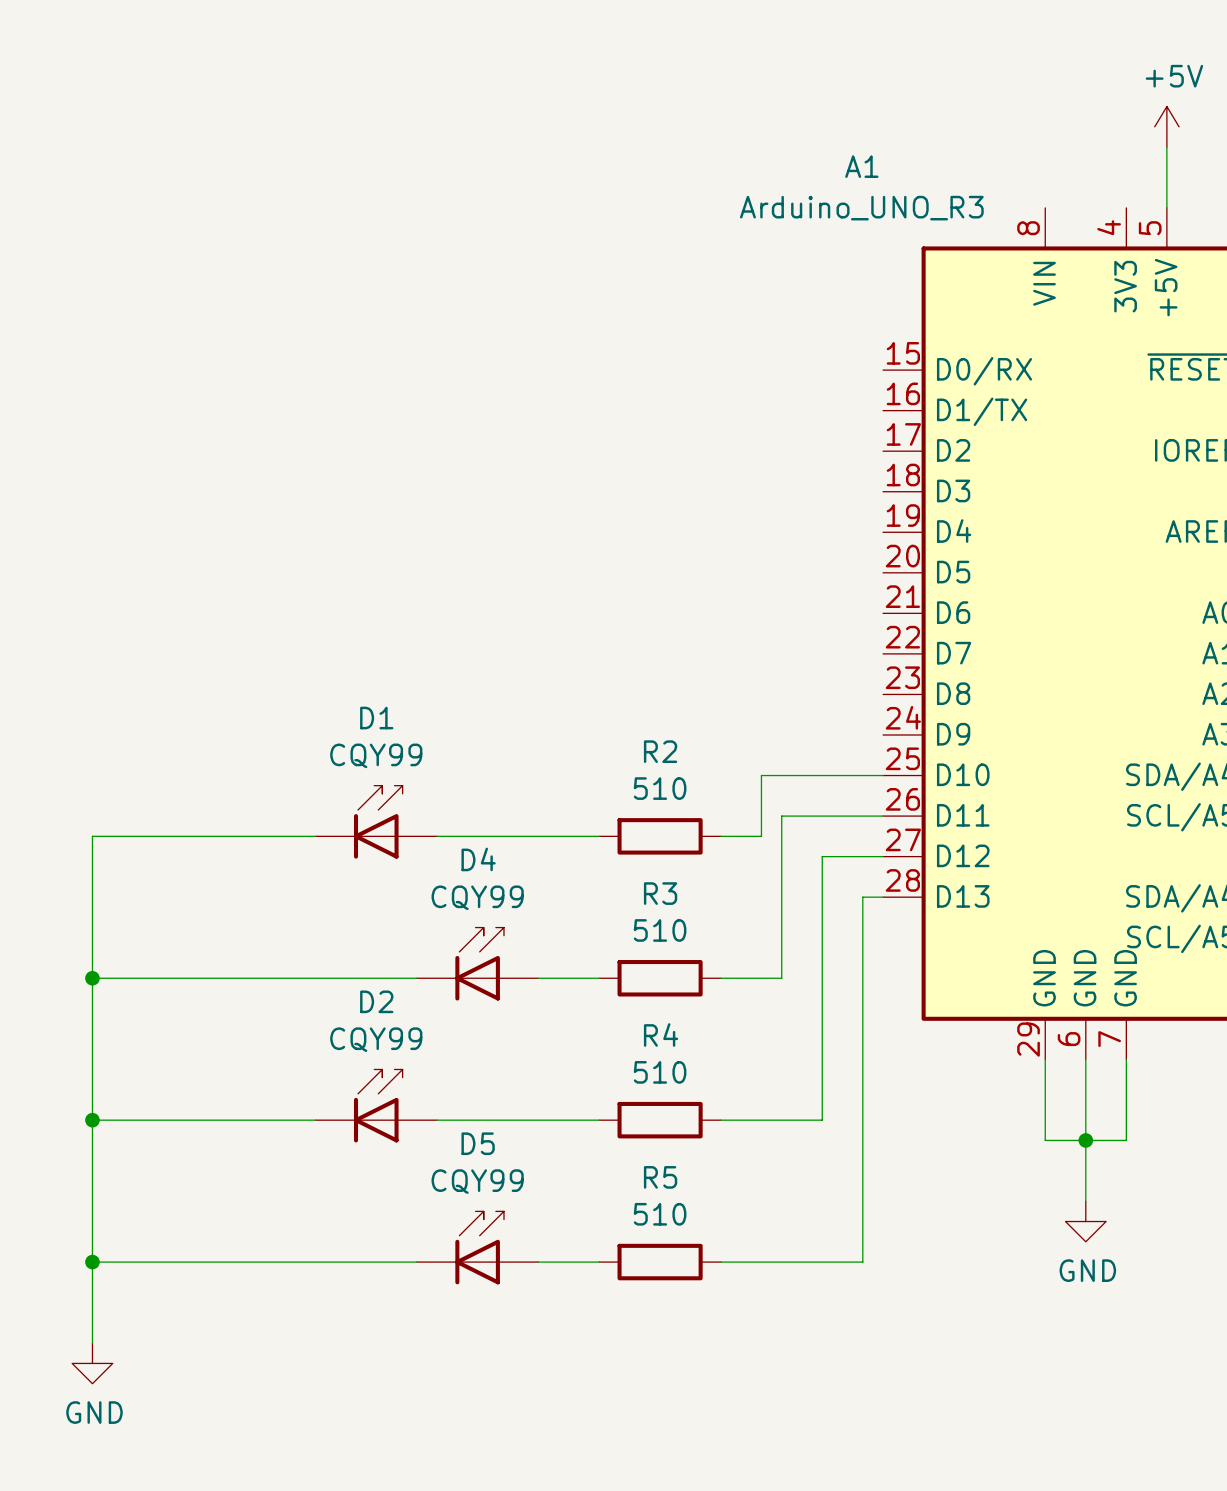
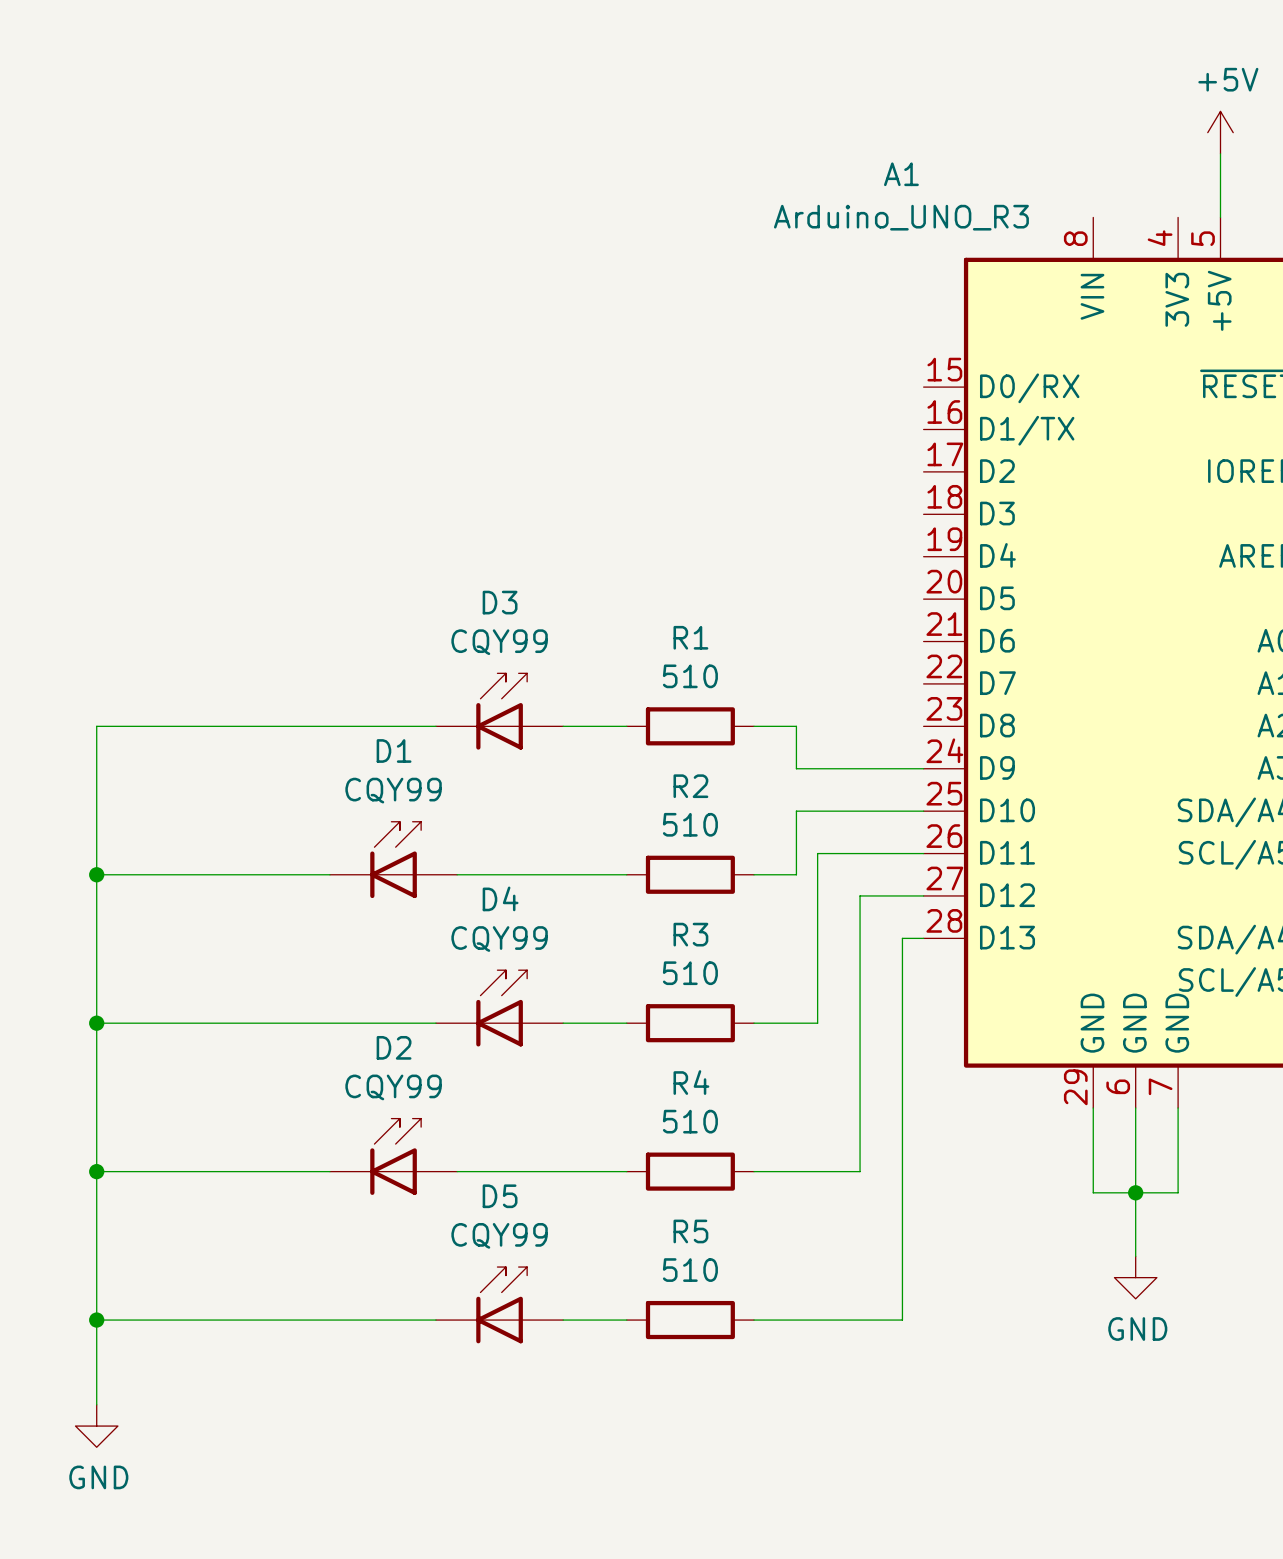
D3: none -> CQY99 (499, 711)
wire: none -> (435, 726) (96, 726) (96, 874)
wire: none -> (563, 726) (626, 726)
R1: none -> 510 (690, 726)
wire: none -> (754, 726) (796, 726) (796, 768) (923, 768)
junction: none -> (96, 874)

